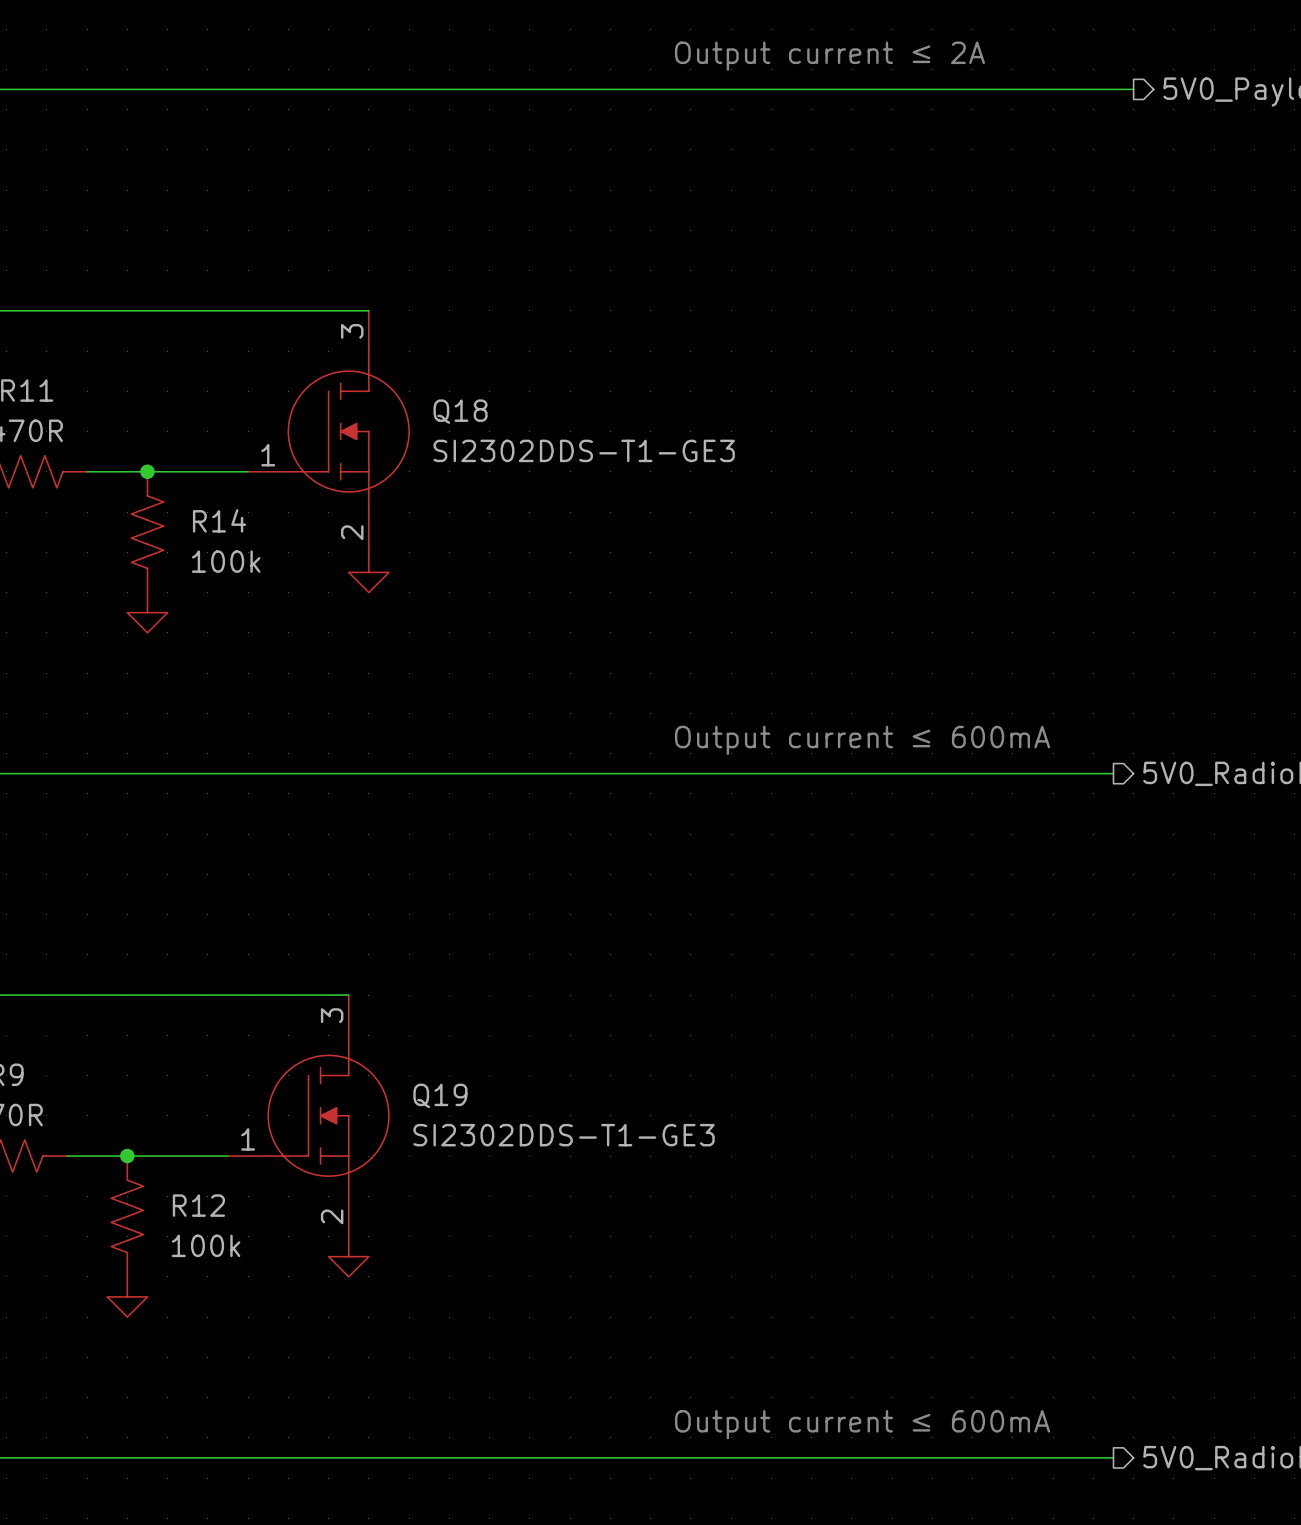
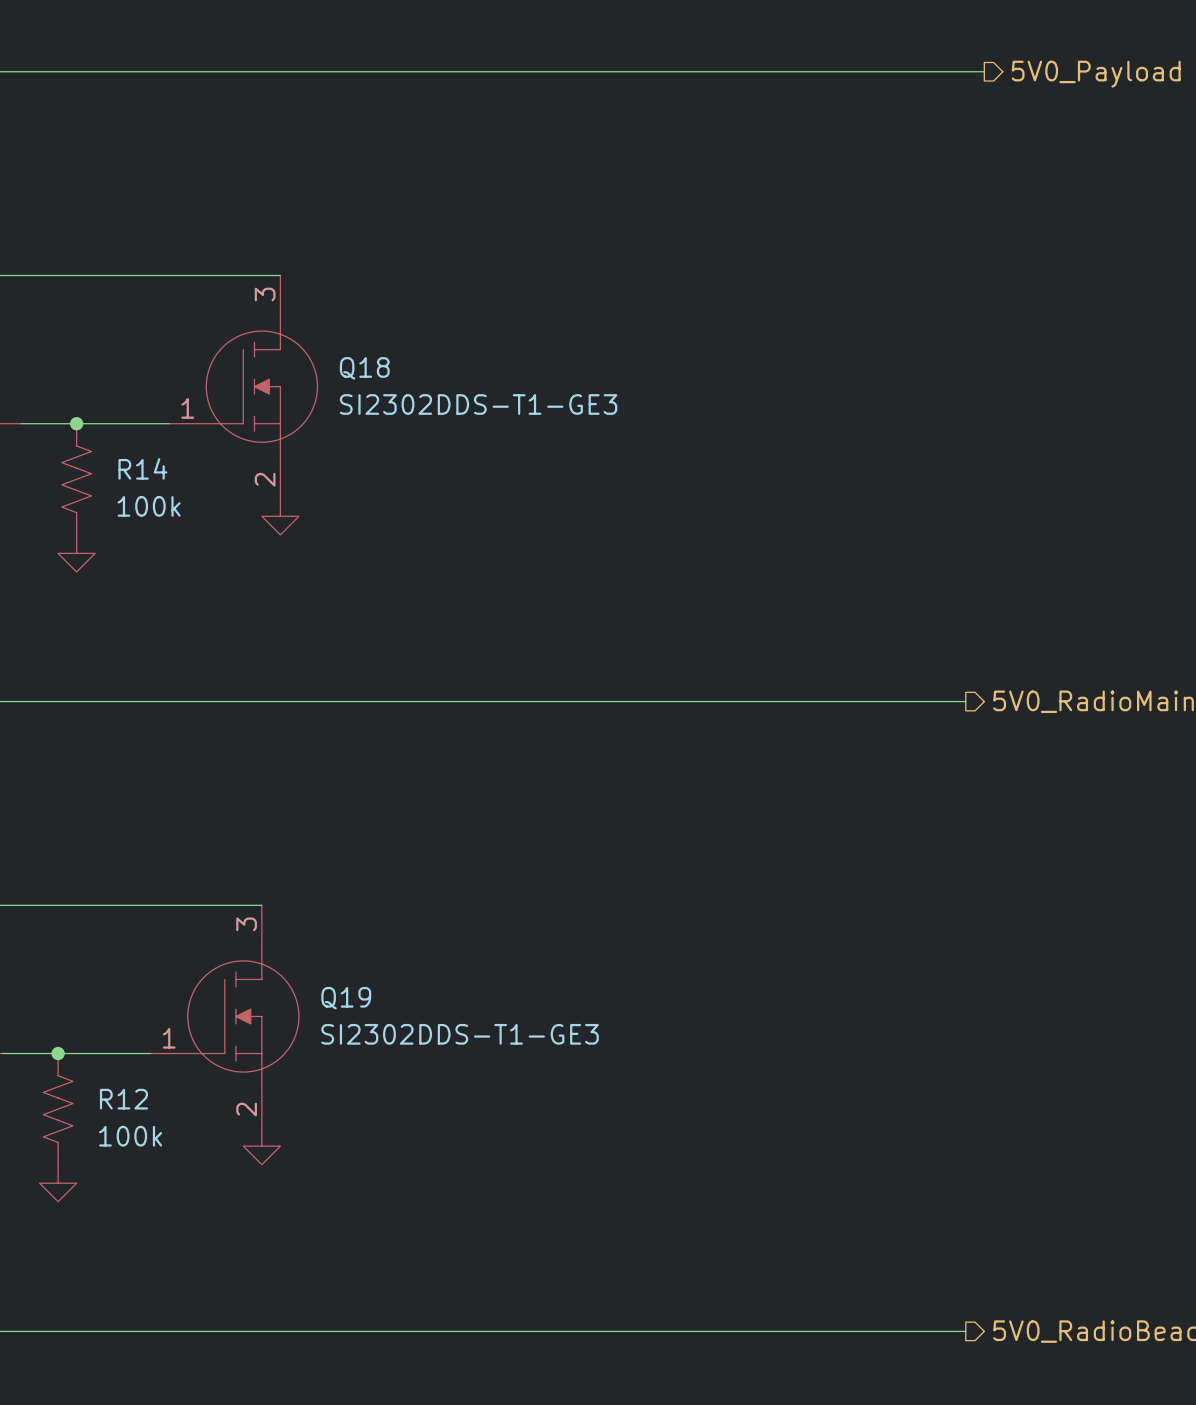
text: Output current ≤ 2A (829, 56) -> none
text: Output current ≤ 600mA (862, 740) -> none
text: Output current ≤ 600mA (862, 1424) -> none

